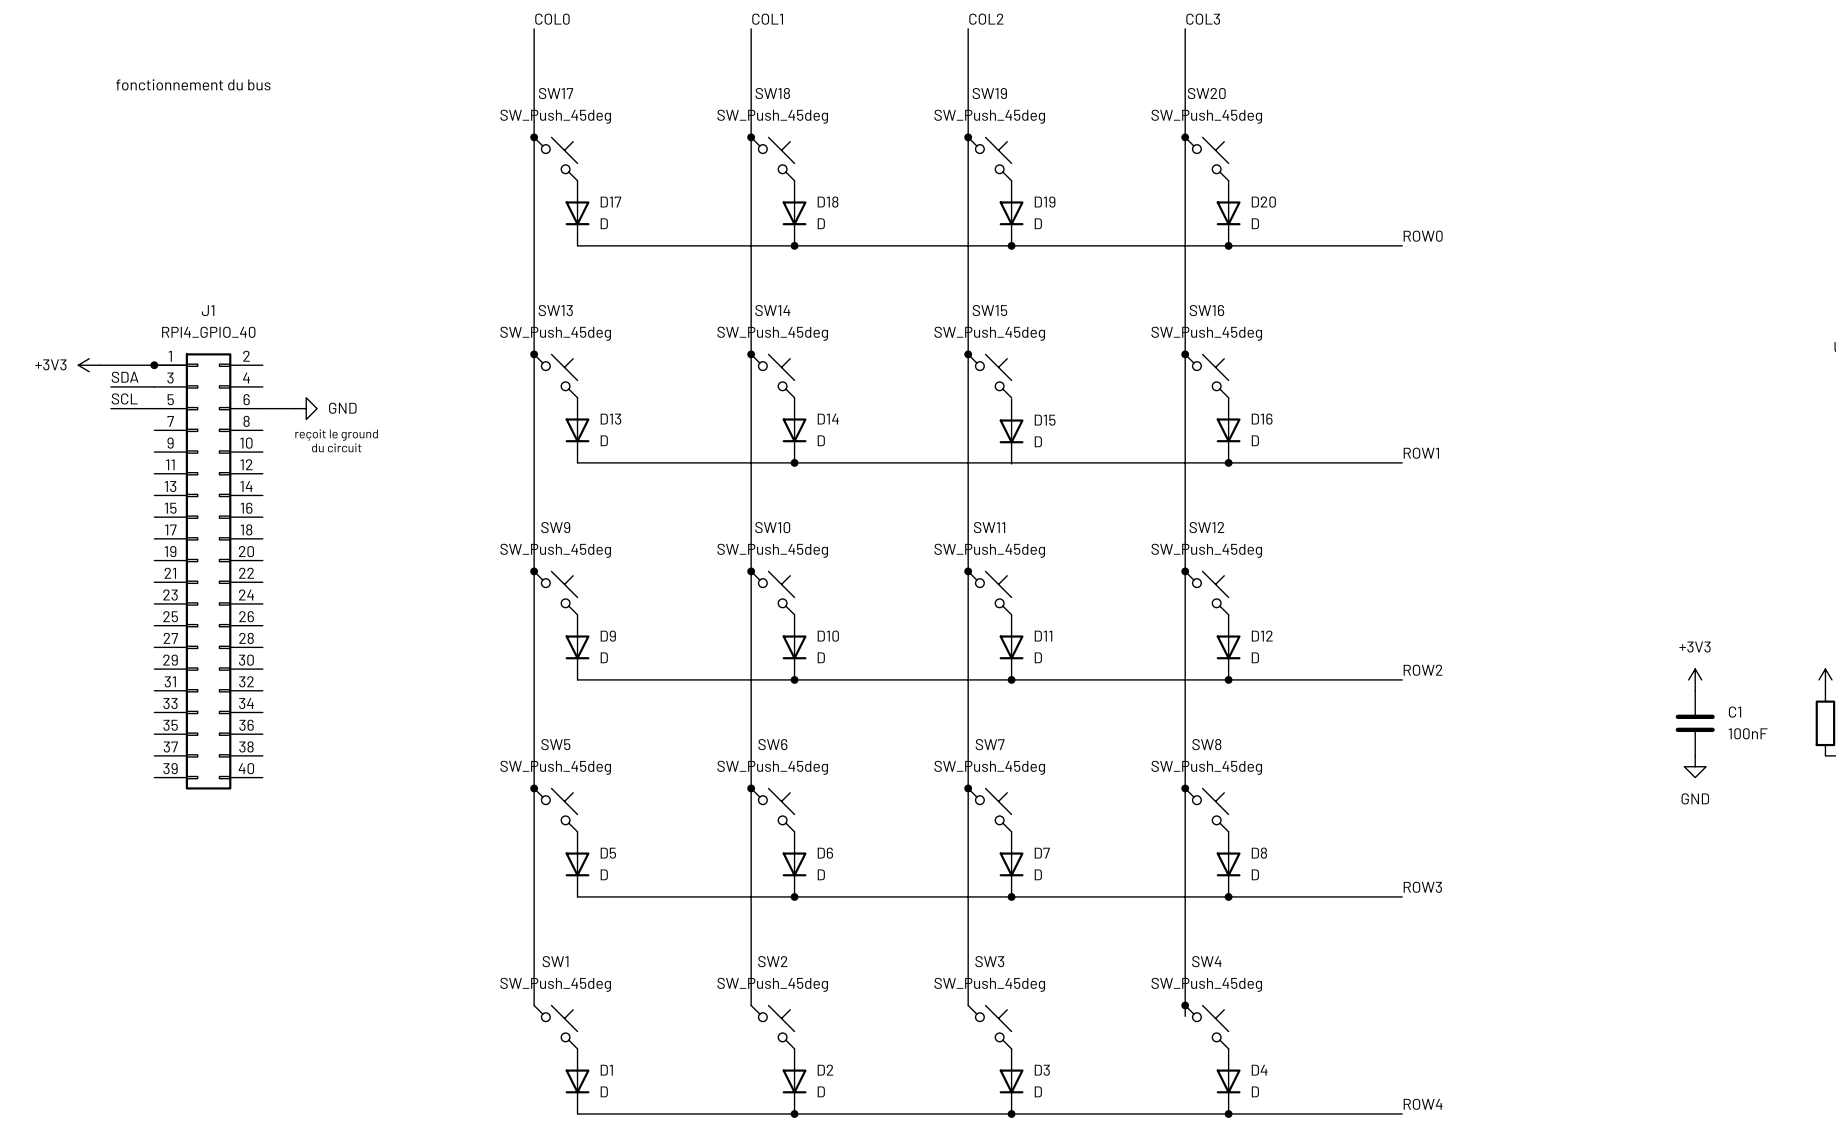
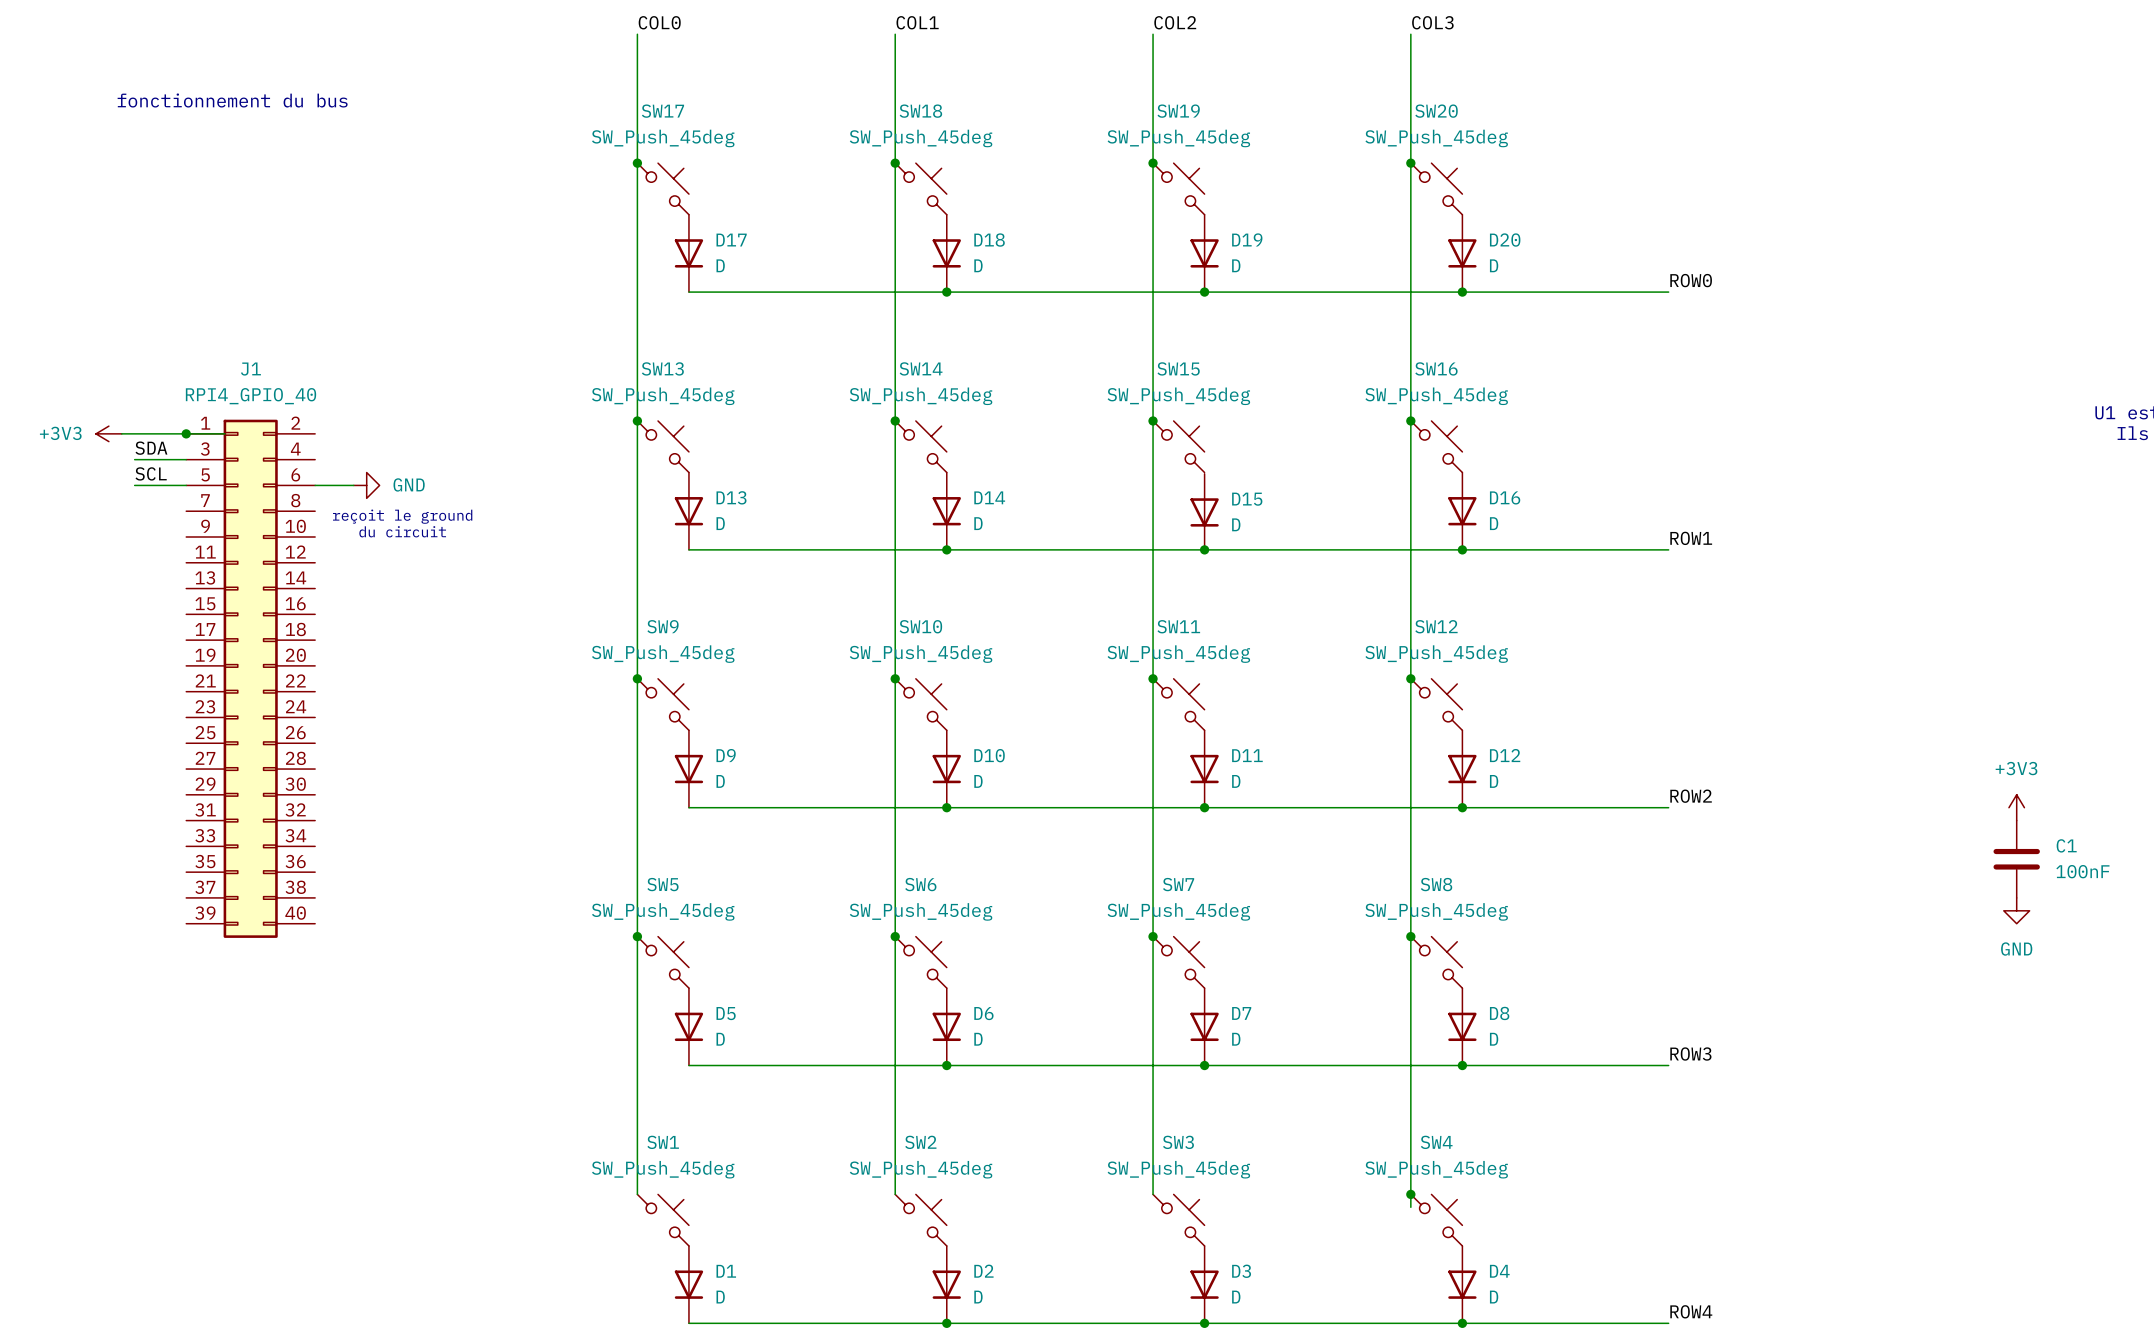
junction: none -> (1204, 549)

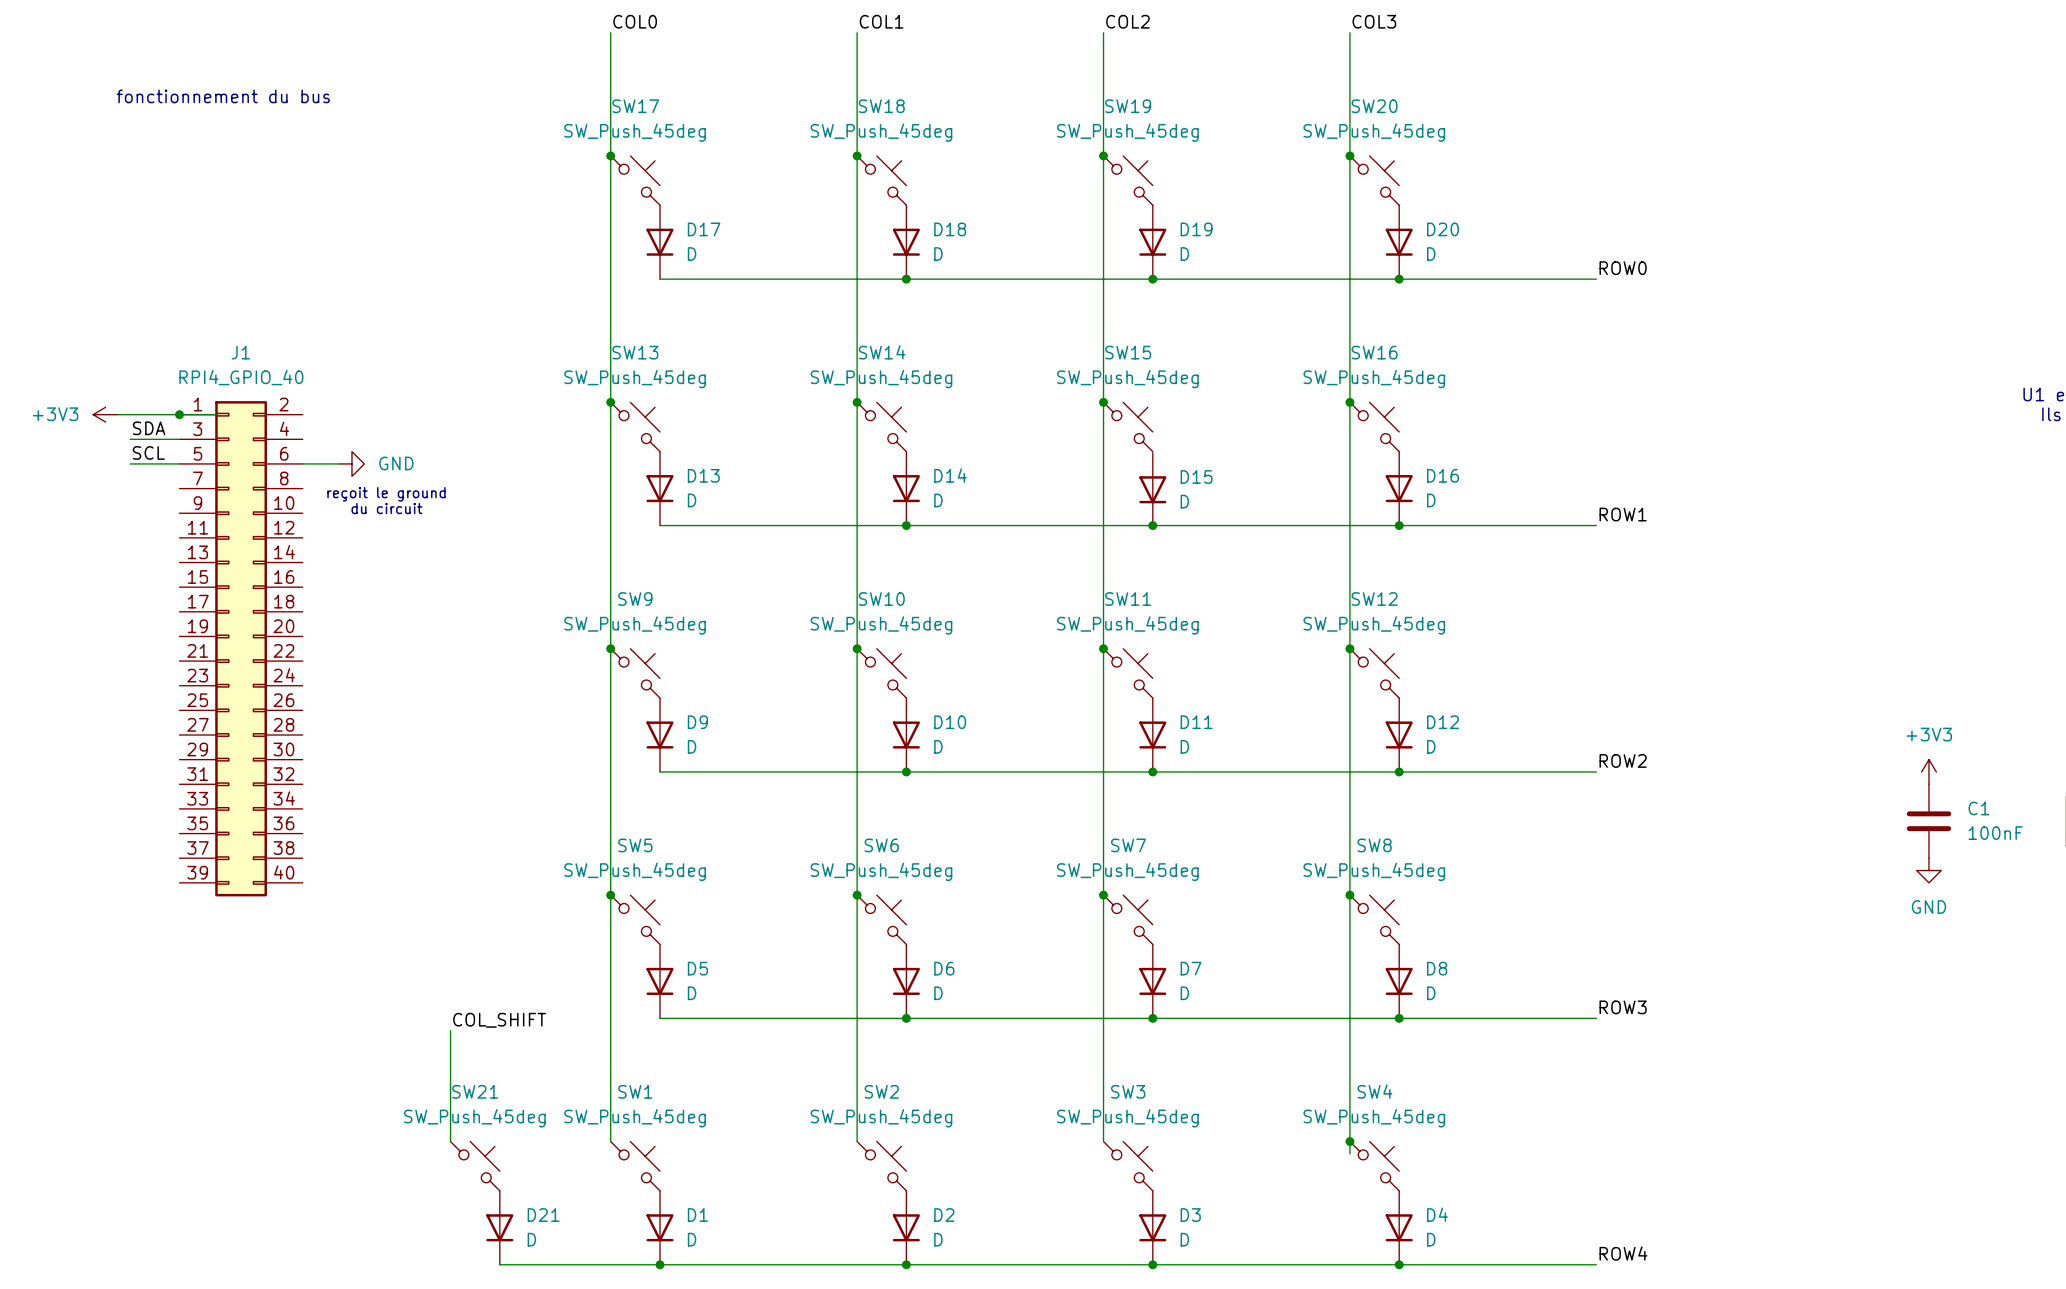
label: none -> COL_SHIFT (499, 1020)
wire: none -> (450, 1030) (450, 1141)
SW21: none -> SW_Push_45deg (475, 1166)
D21: none -> D (499, 1227)
wire: none -> (499, 1264) (659, 1264)
junction: none -> (659, 1264)

